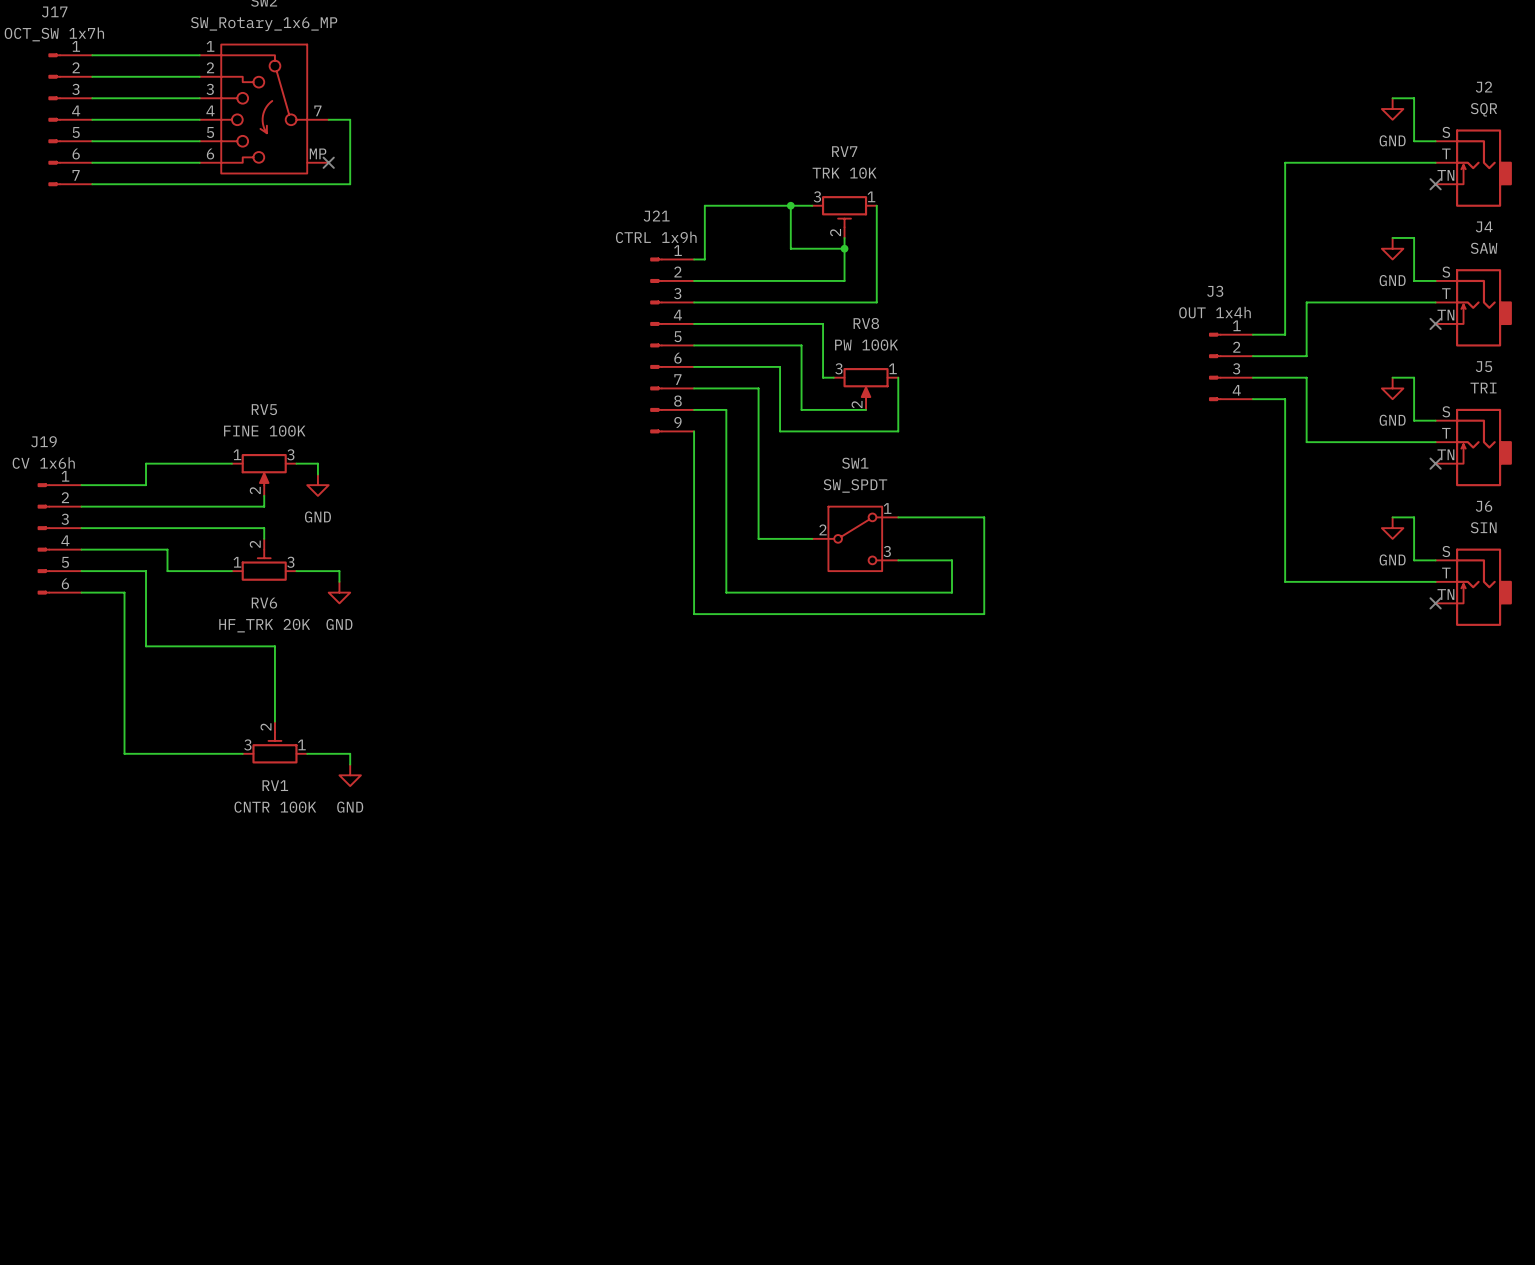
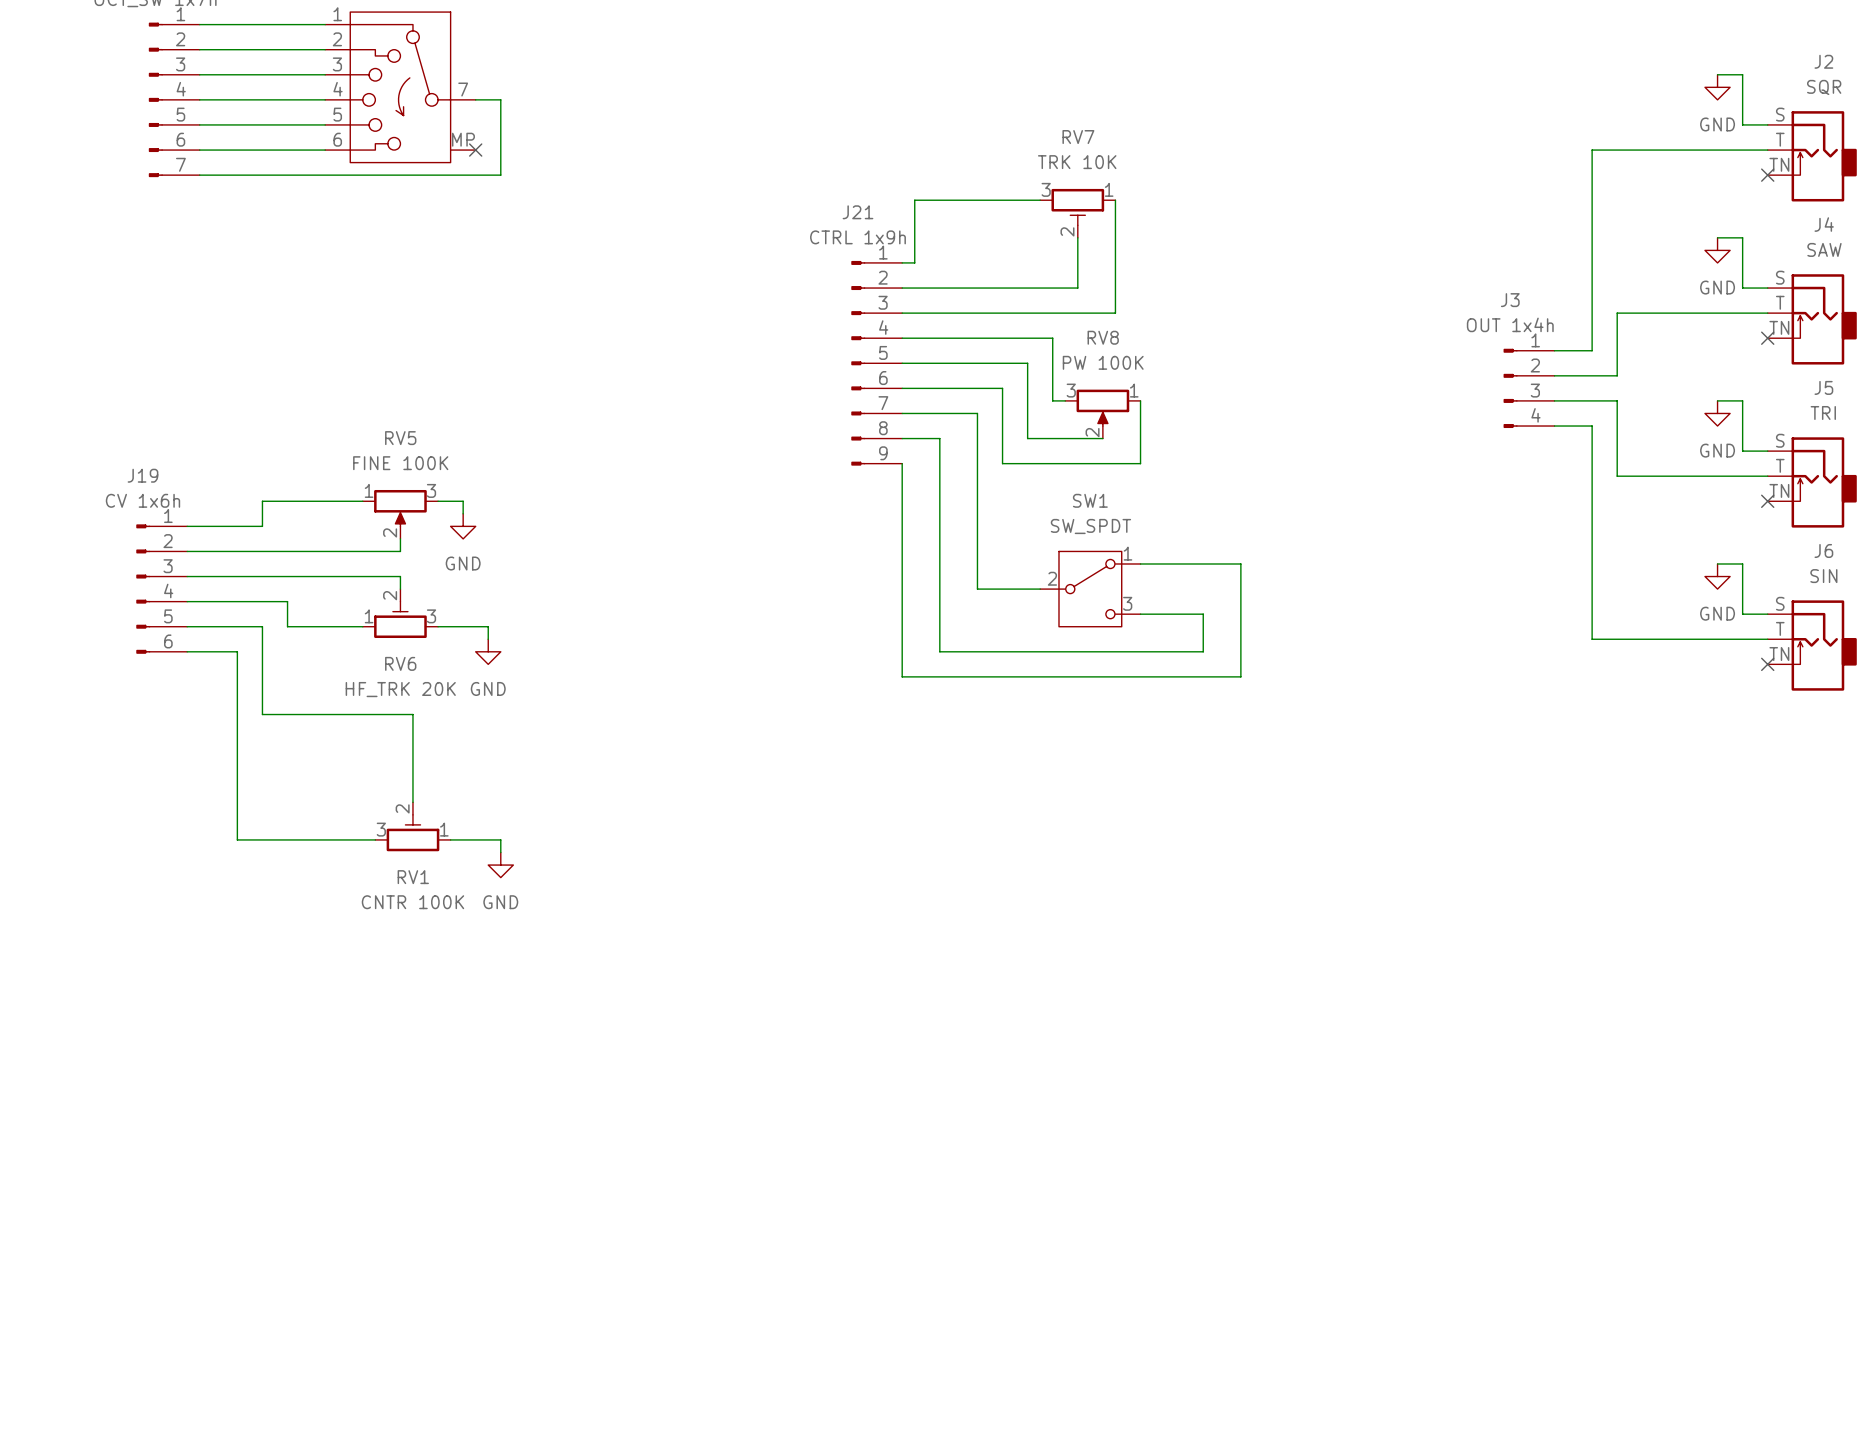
wire: (790, 205) (790, 248) (844, 248) -> none
junction: (790, 205) -> none
junction: (844, 248) -> none

